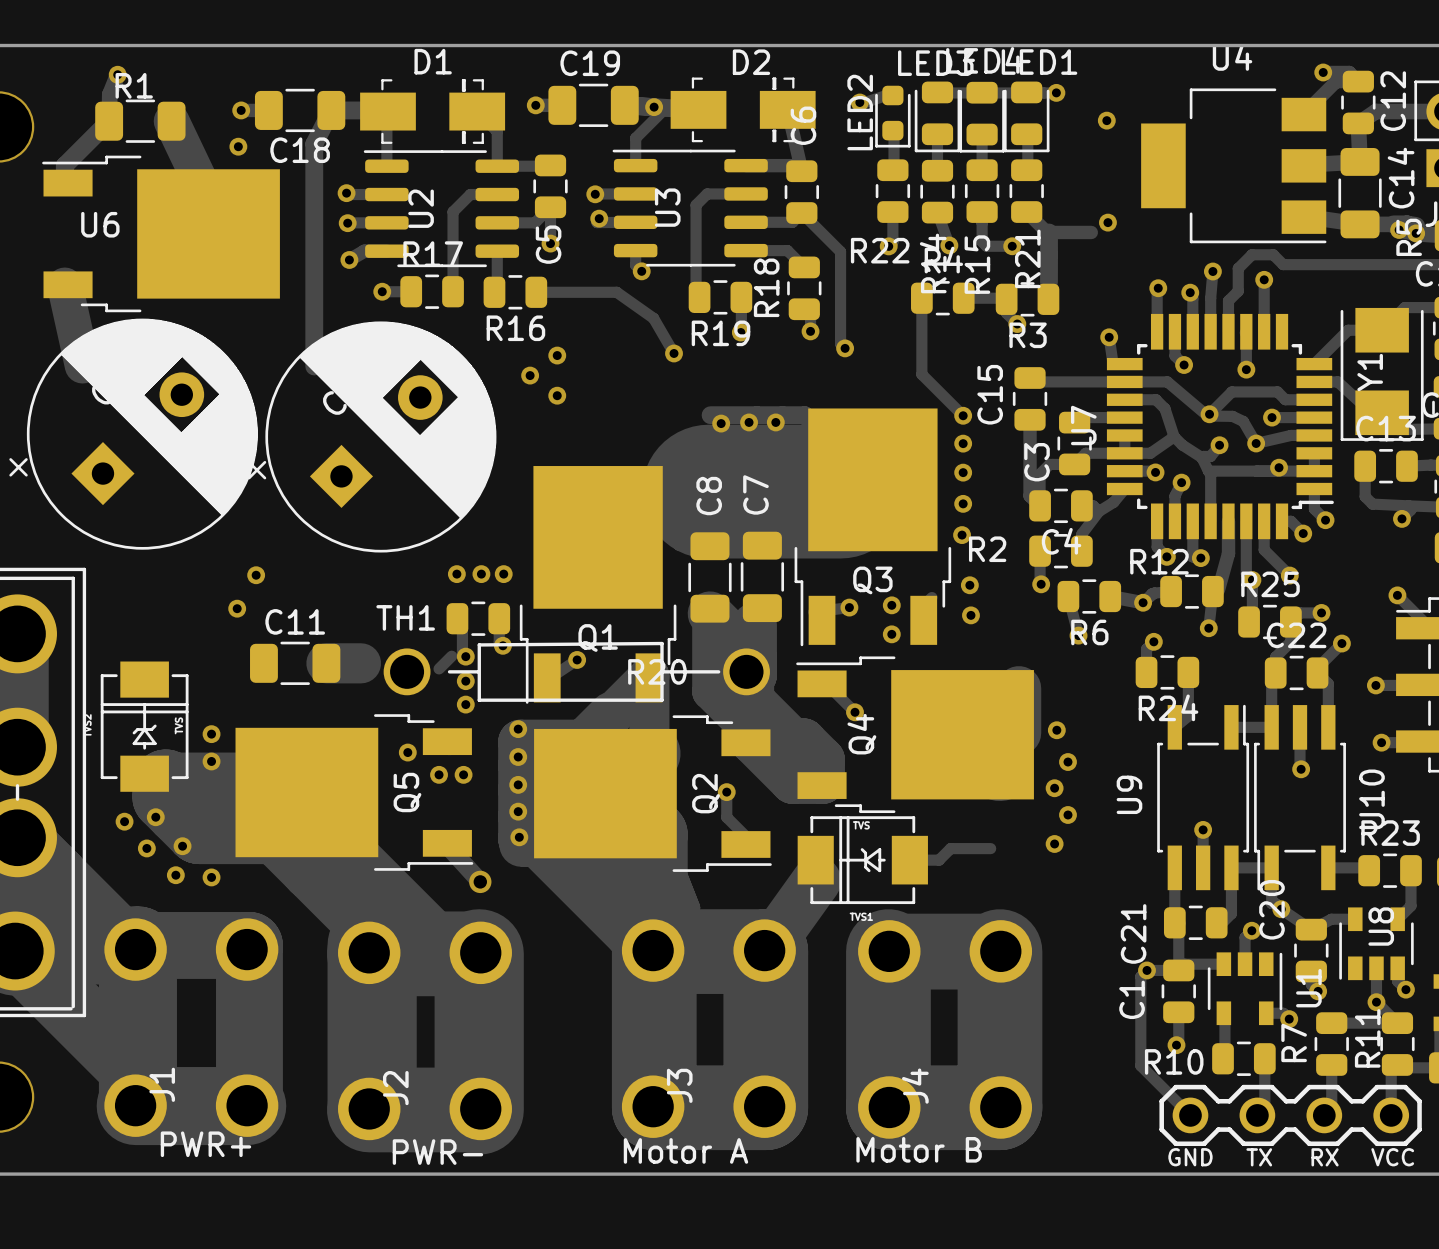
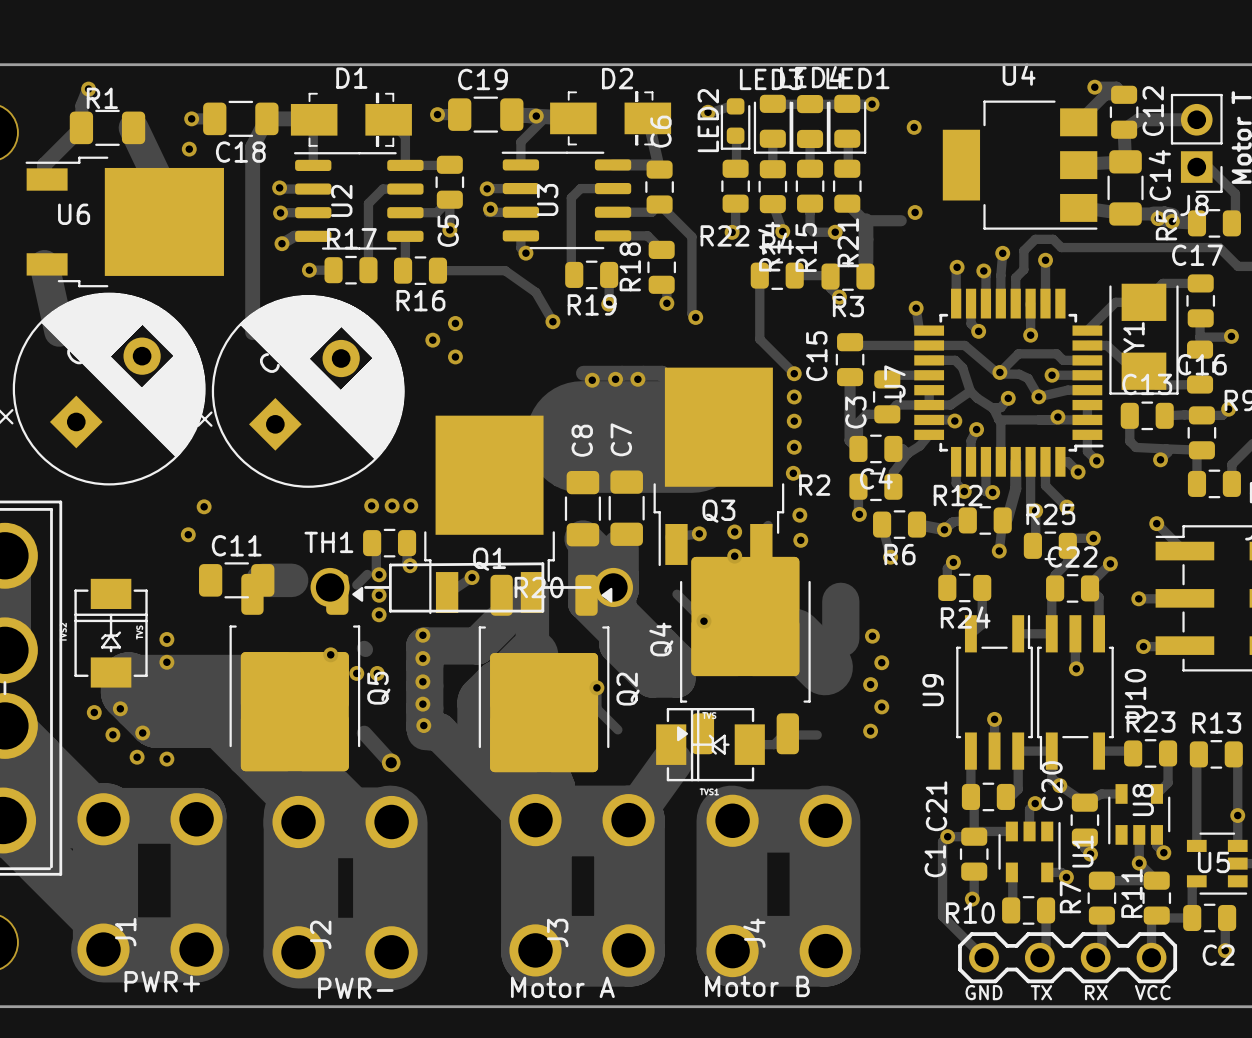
Q4 footprint: [796, 656, 1034, 814] -> [677, 556, 811, 755]
Q5 footprint: [235, 714, 474, 871] -> [229, 573, 364, 772]
Q2 footprint: [534, 715, 772, 872] -> [478, 574, 613, 773]
Q4 name position: Q4 (861, 734) -> Q4 (661, 639)
Q5 name position: Q5 (407, 792) -> Q5 (378, 688)
Q2 name position: Q2 (706, 793) -> Q2 (628, 689)

